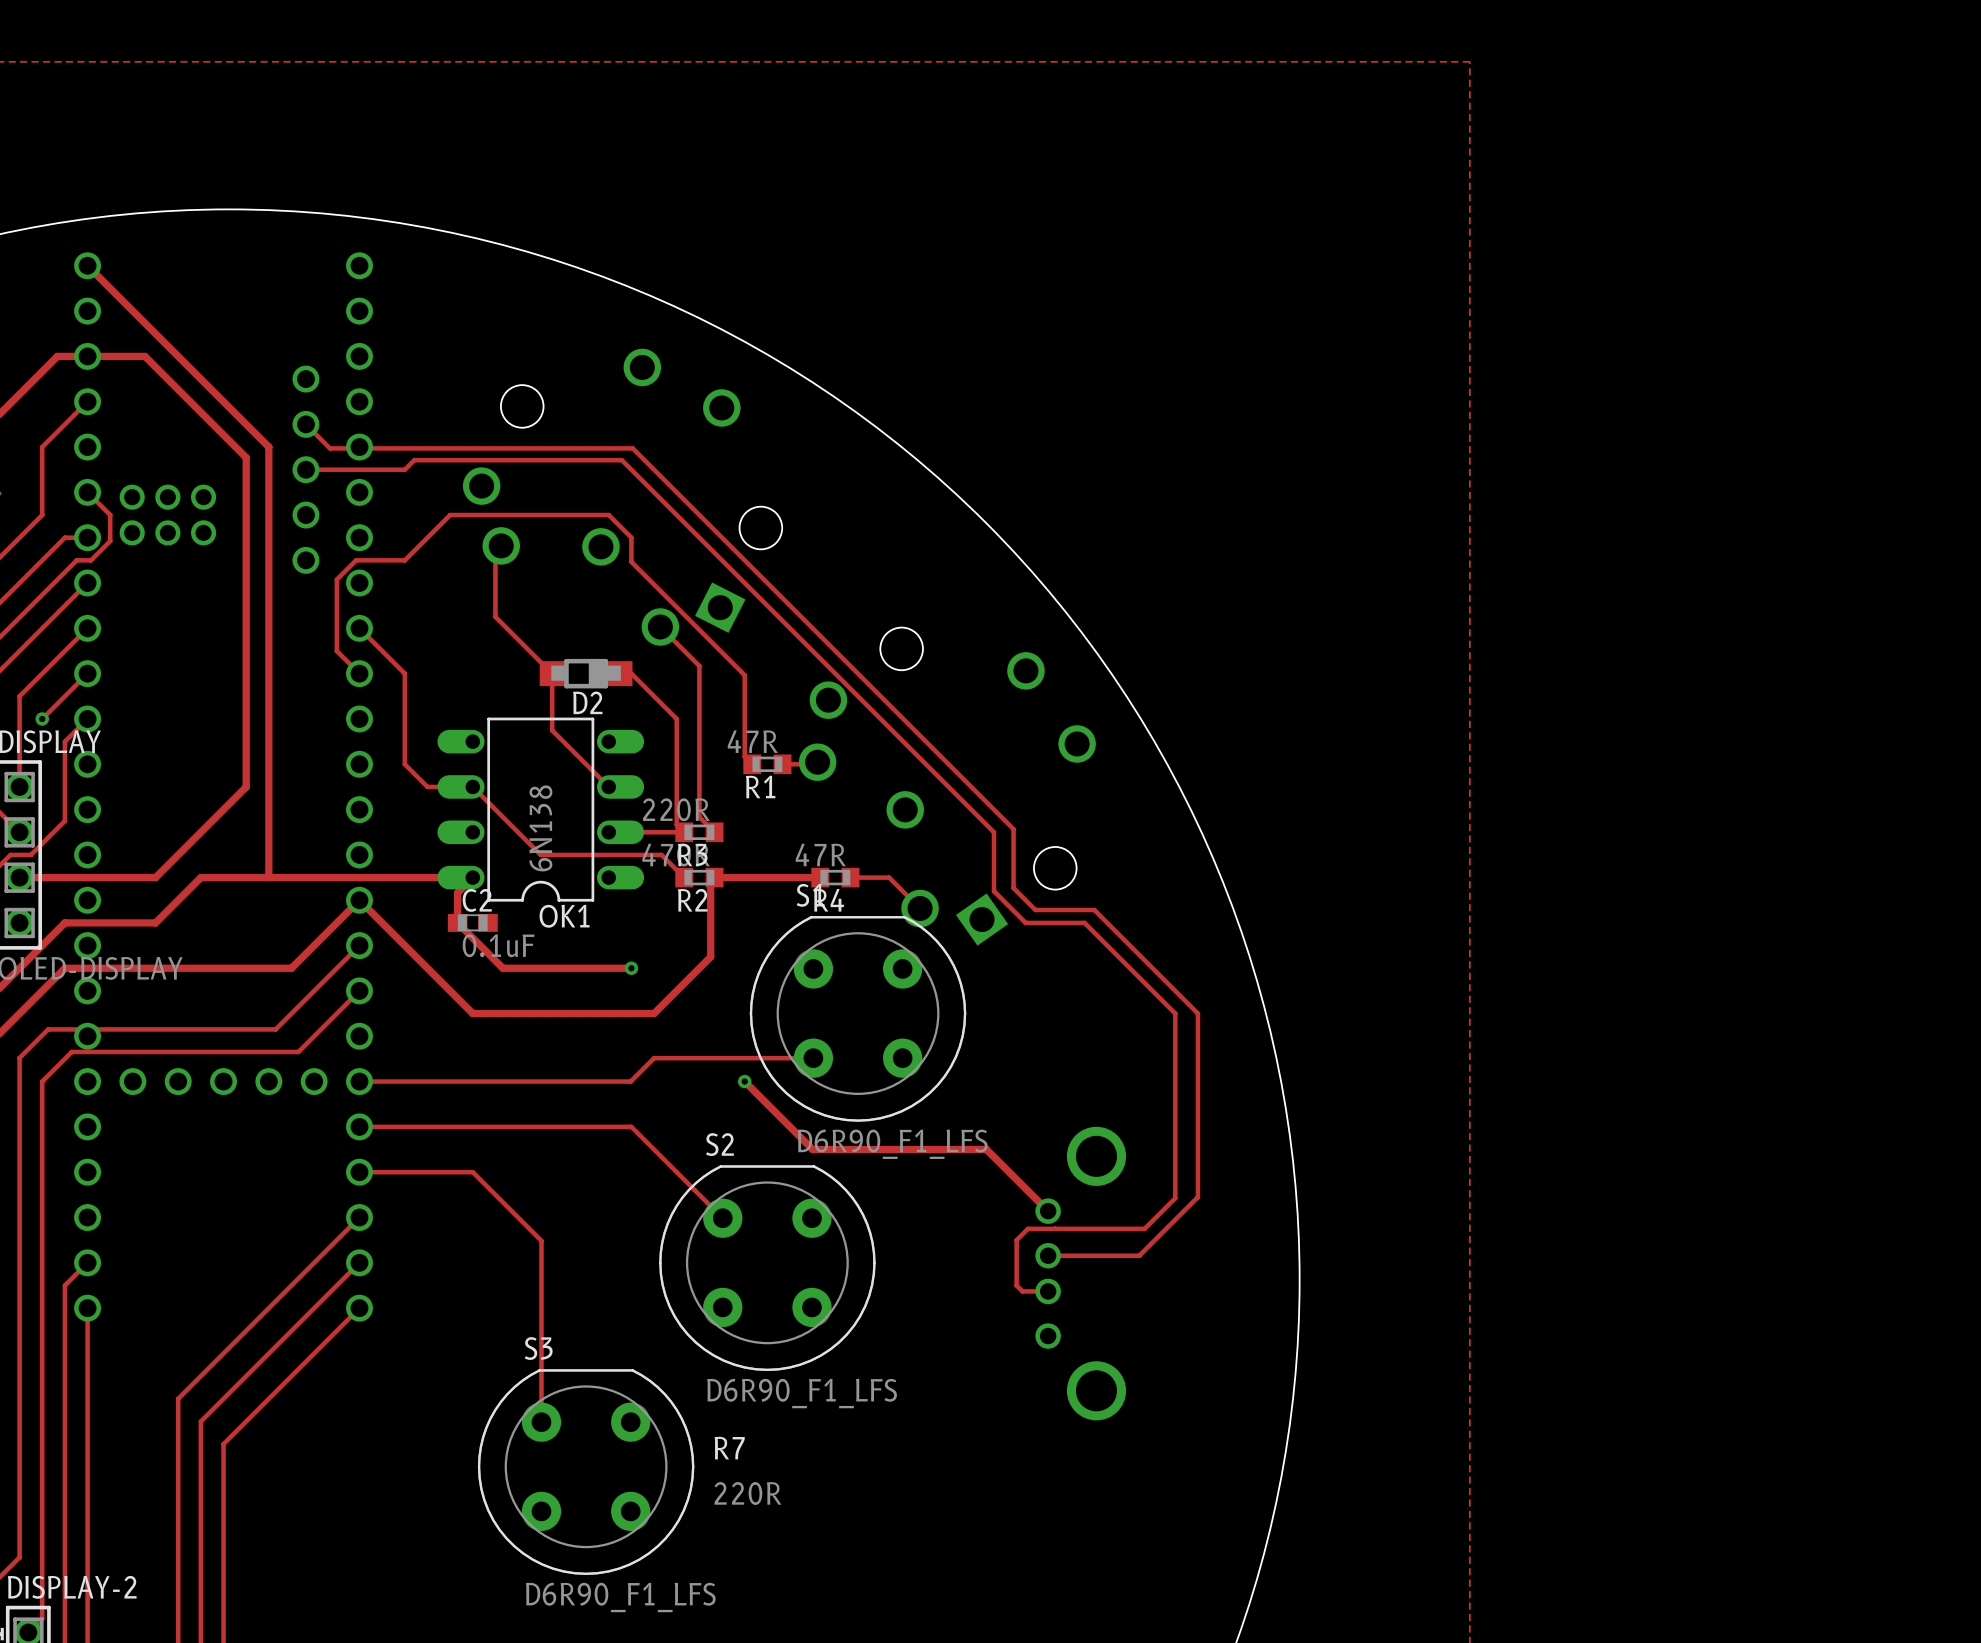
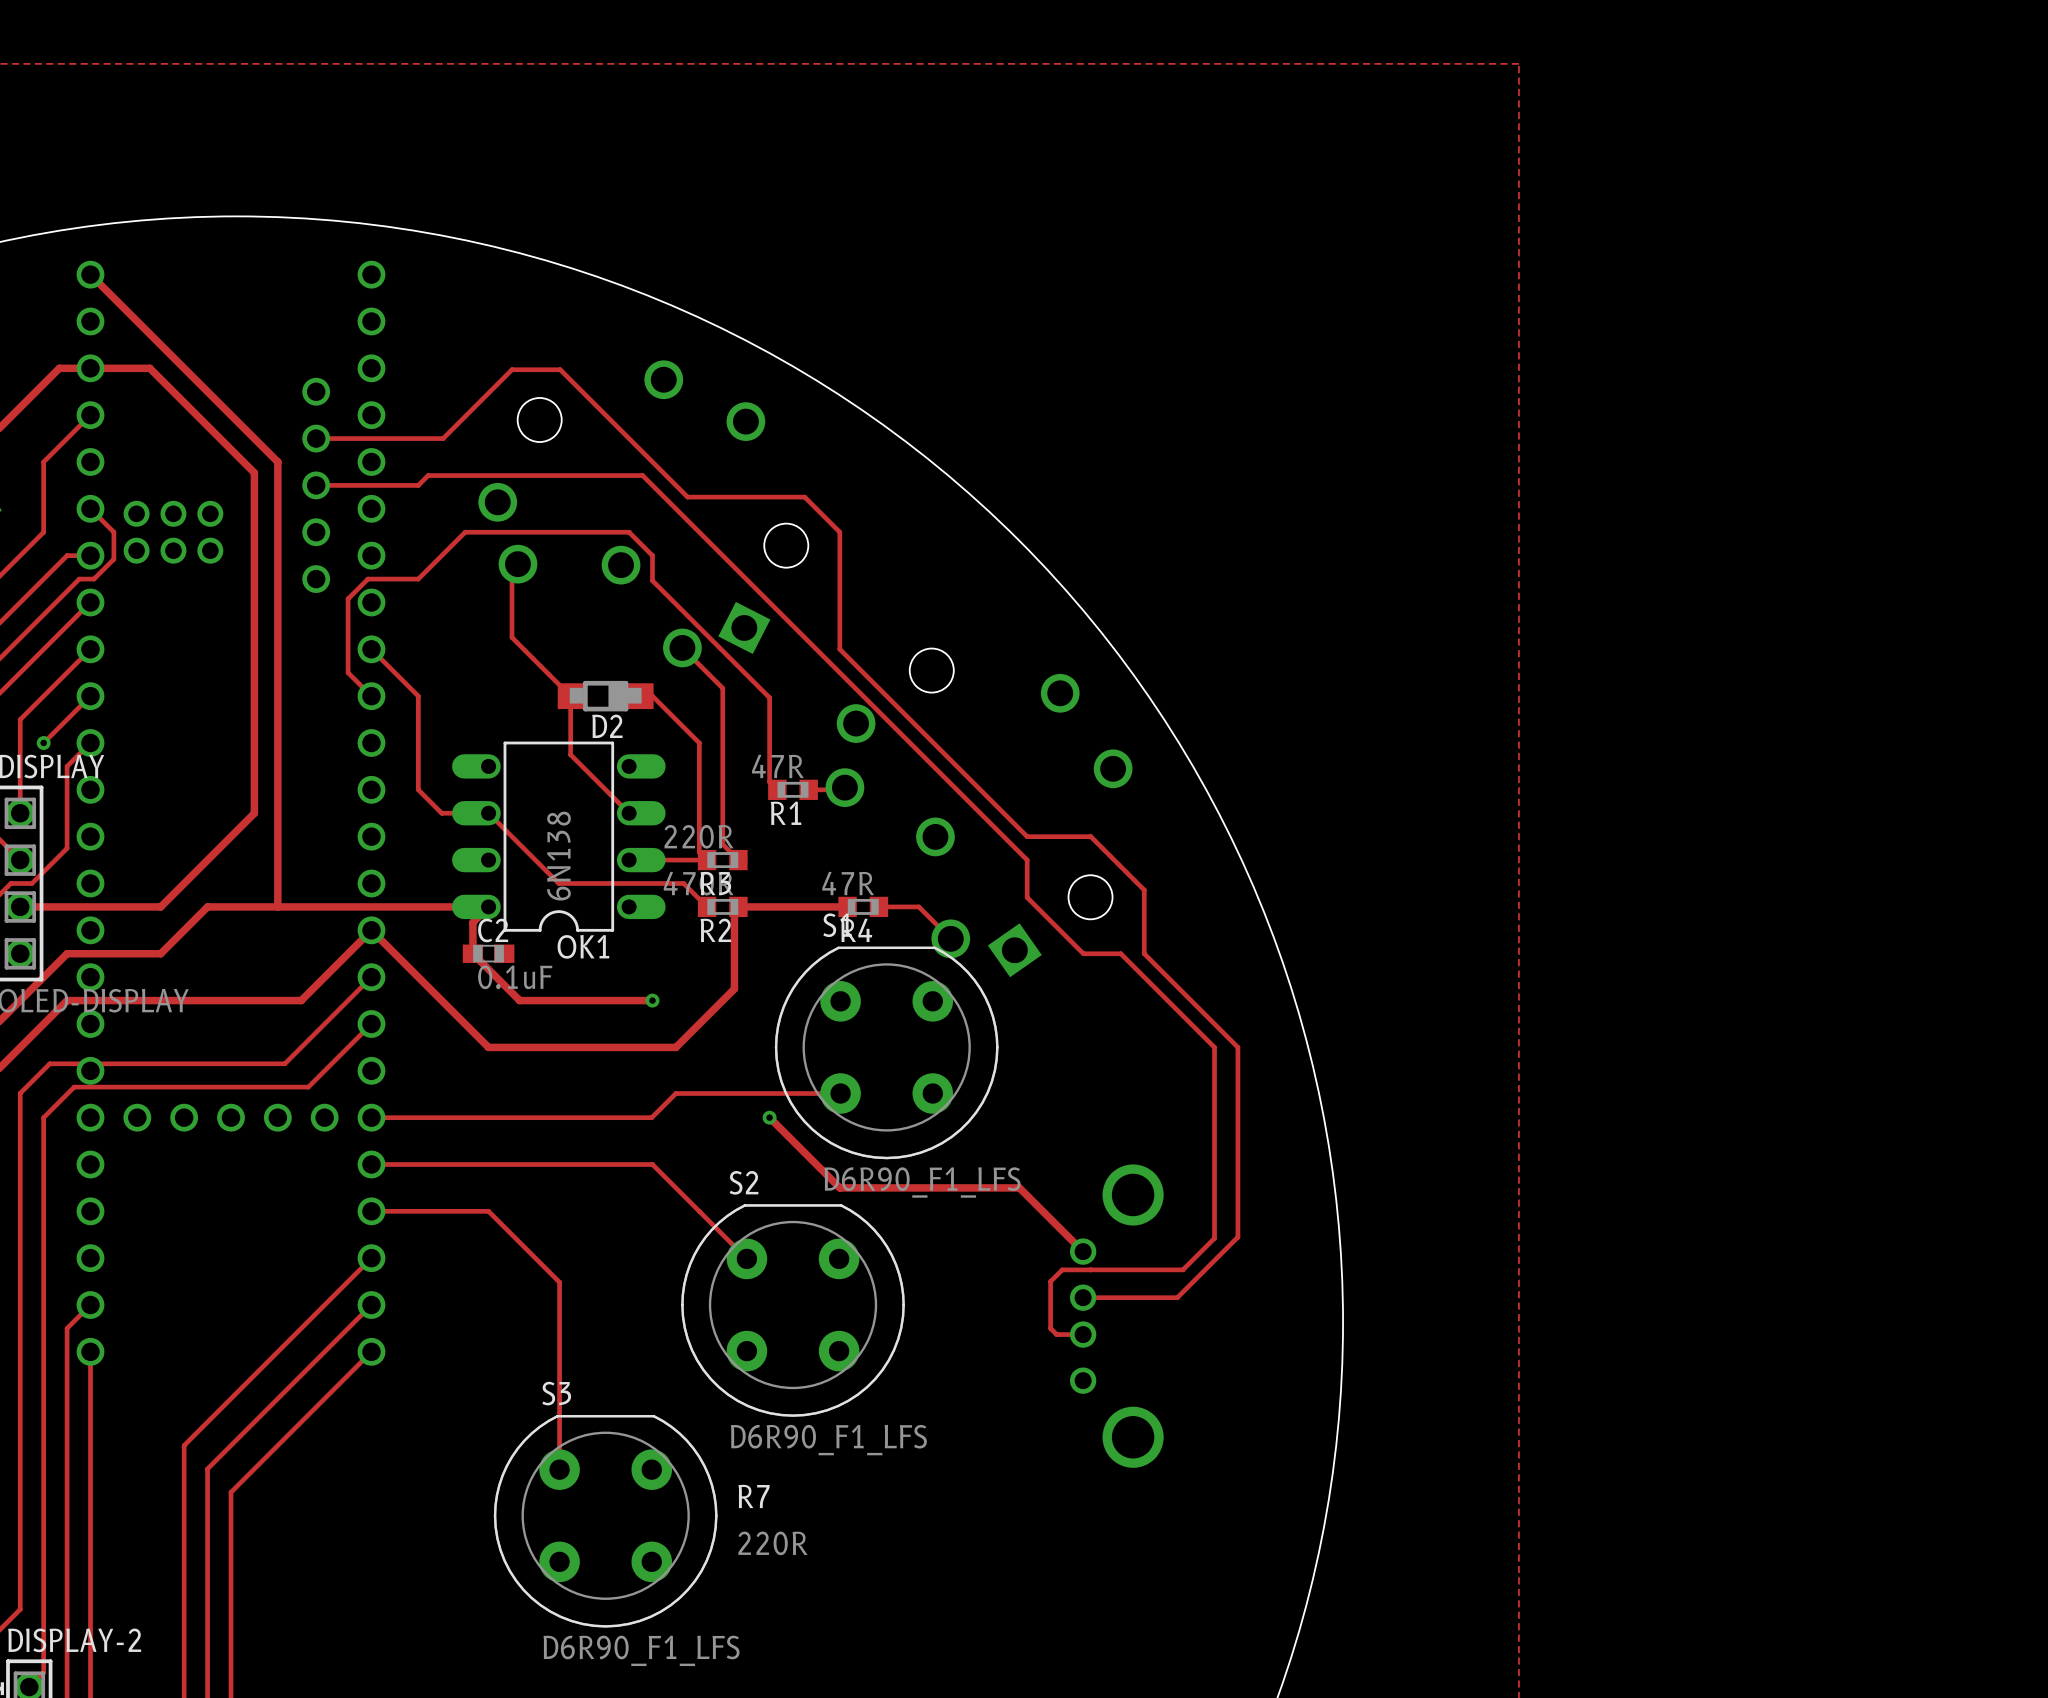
track: (305, 424) (329, 448) (632, 448) -> (316, 438) (443, 438) (512, 369) (560, 369) (653, 463)
track: (665, 481) (812, 628) -> (687, 497) (804, 497) (839, 532) (839, 649)
track: (993, 809) (1013, 829) (1013, 888) -> (1027, 836) (1090, 836) (1144, 890) (1144, 953)
track: (993, 868) (993, 891) (1025, 922) (1048, 922) -> (1027, 897) (1047, 917)
track: (1035, 910) (1094, 910) (1107, 922) -> (1070, 940) (1083, 953)

